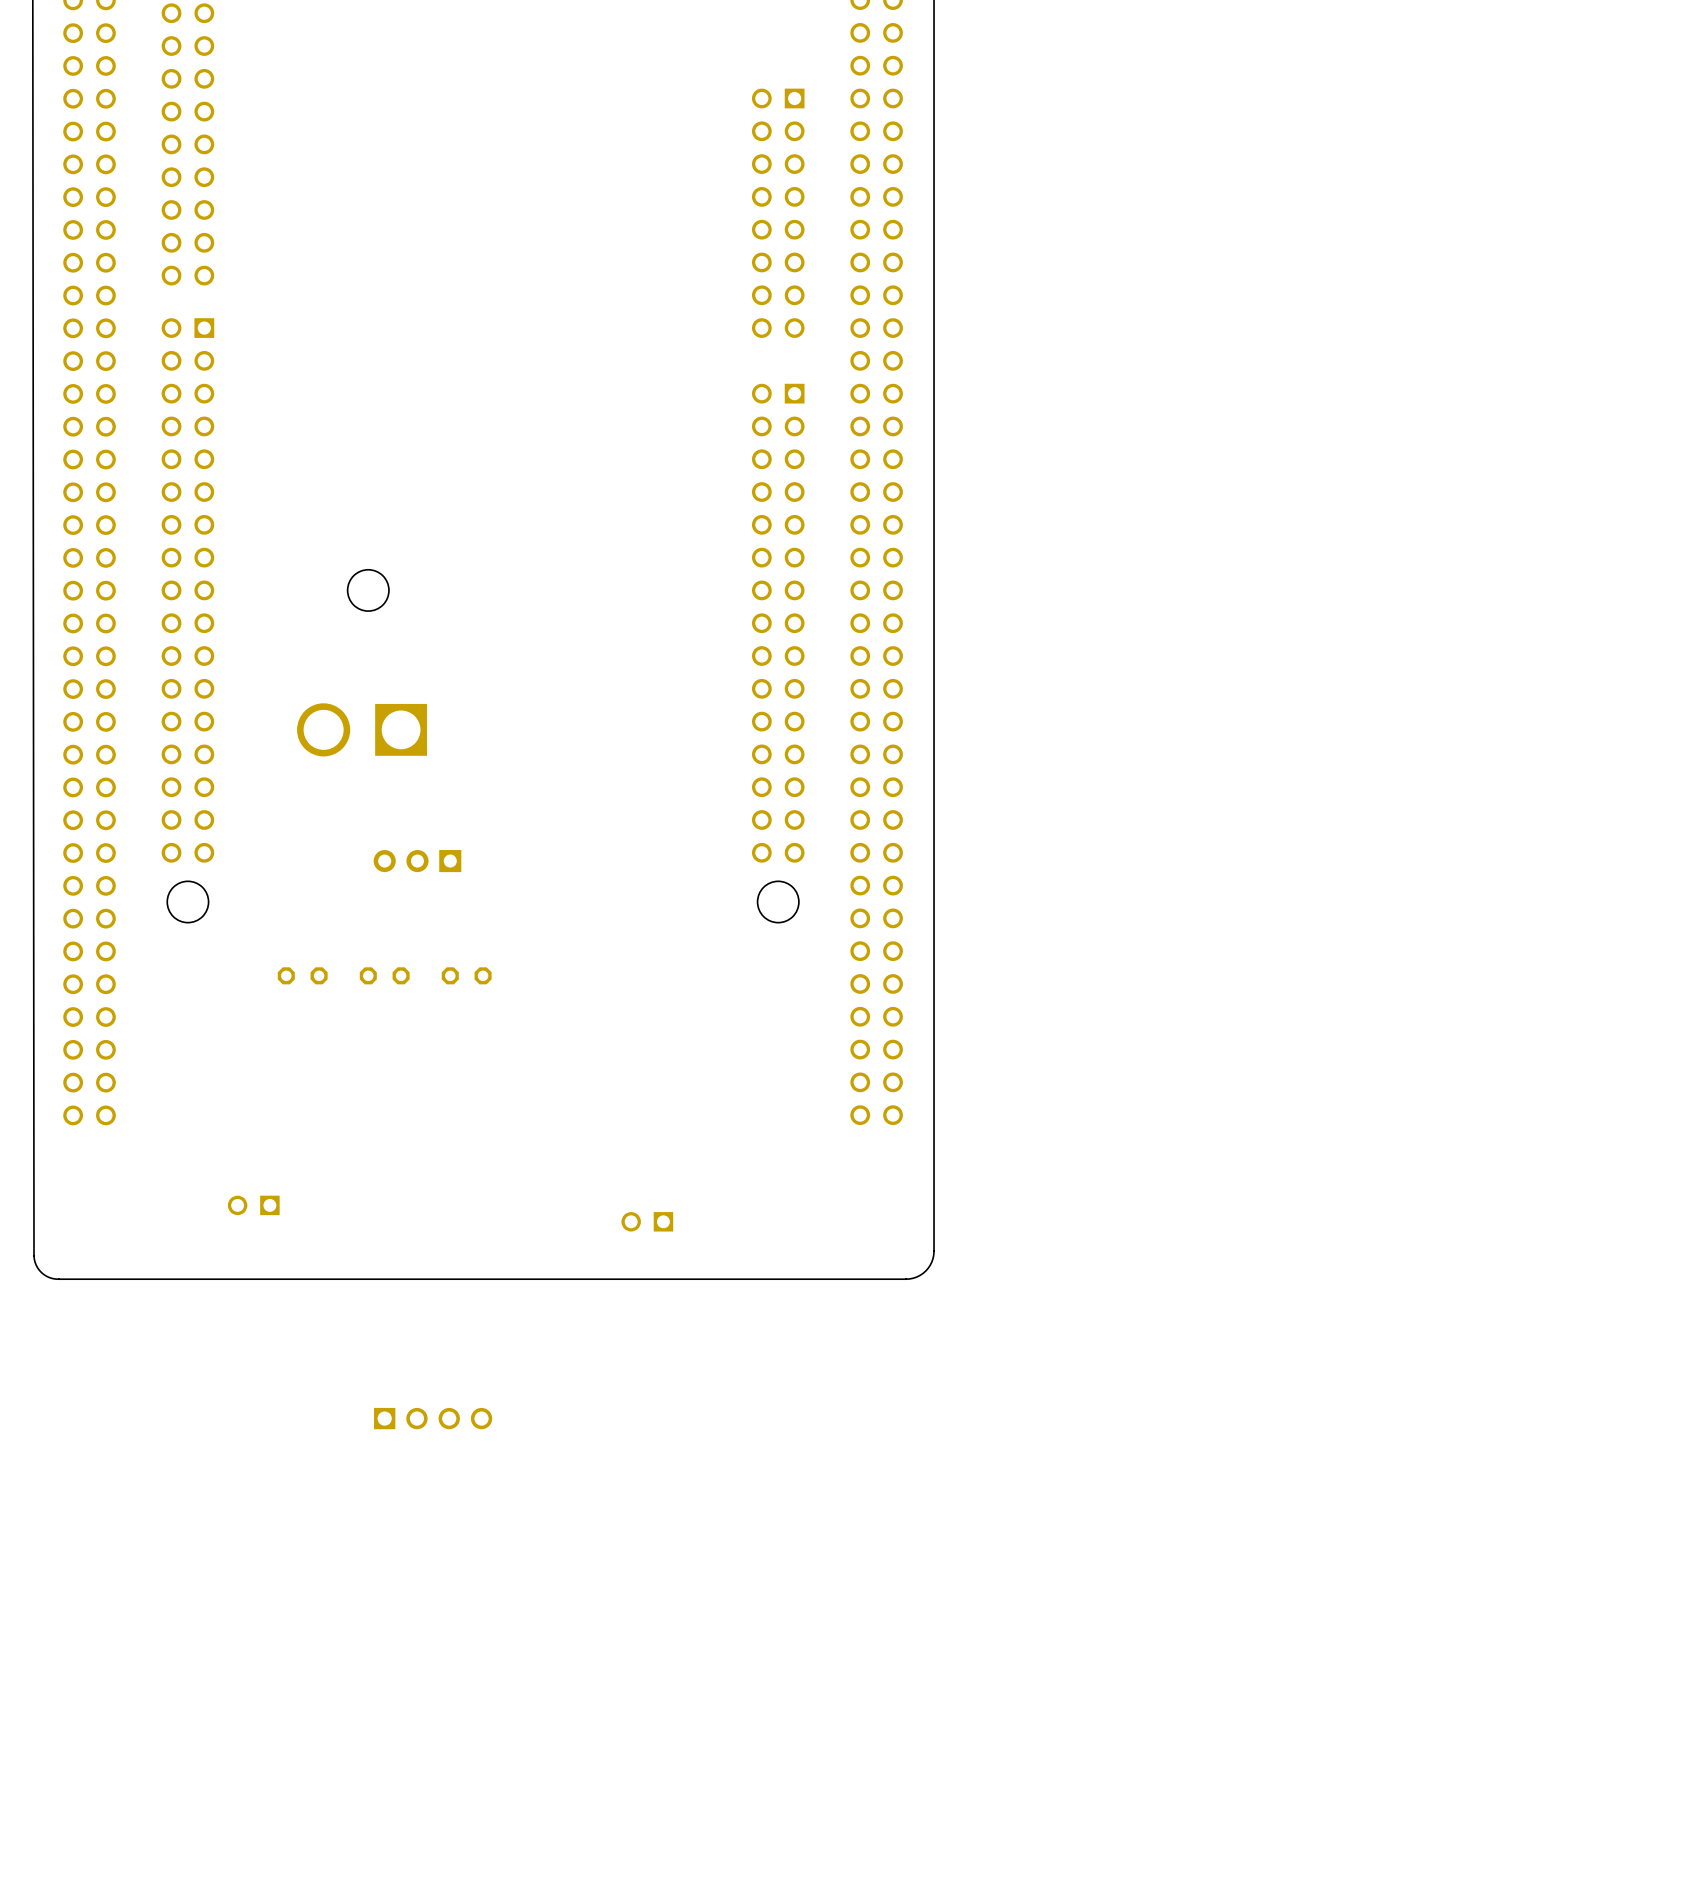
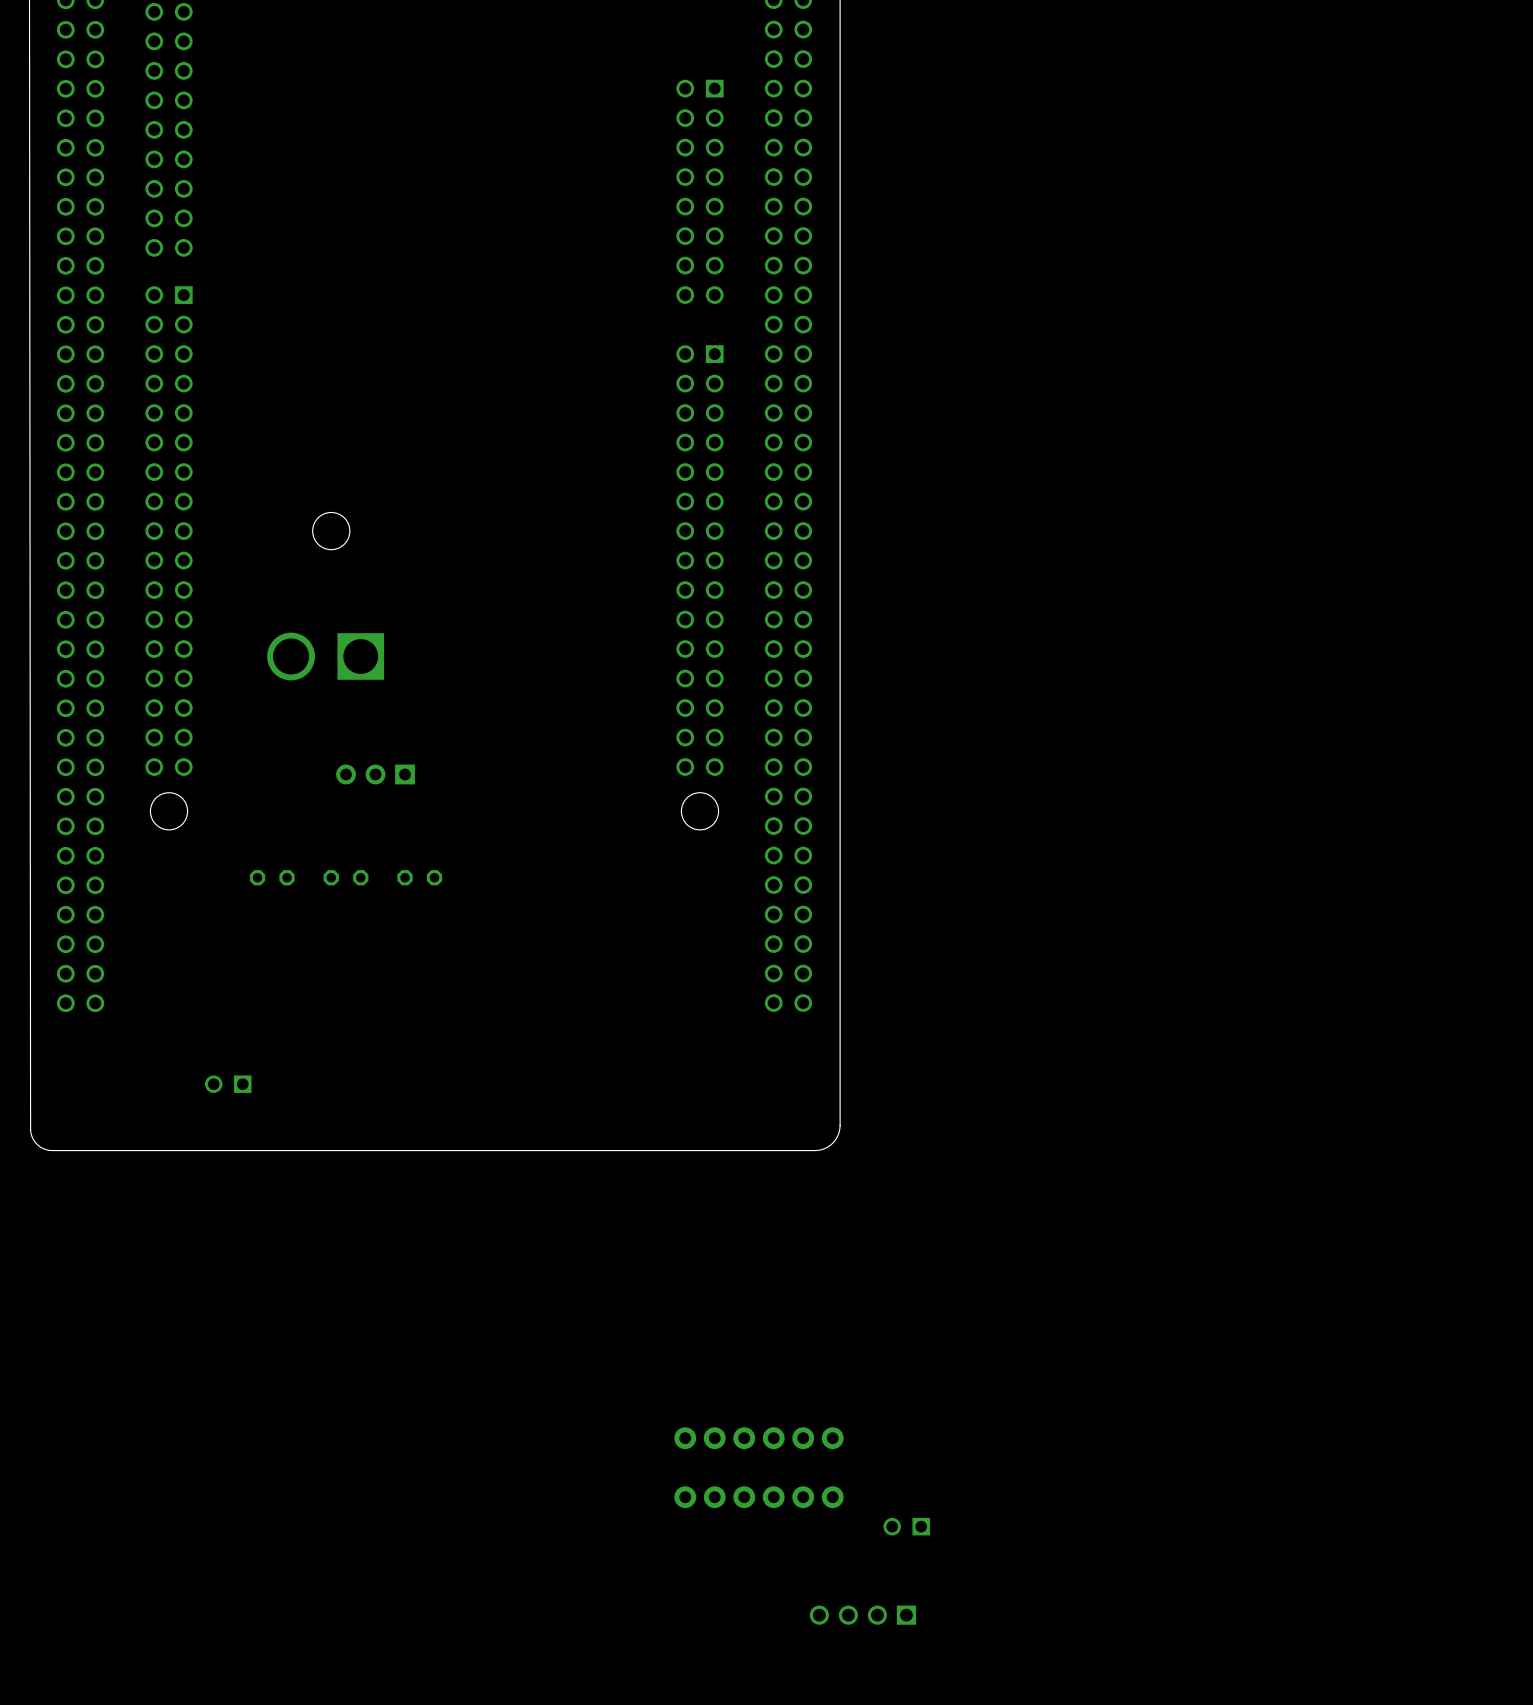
part: (647, 1221) -> none
part: (433, 1418) -> none
part: none -> (758, 1438)
part: none -> (758, 1497)
part: none -> (906, 1526)
part: none -> (862, 1615)

